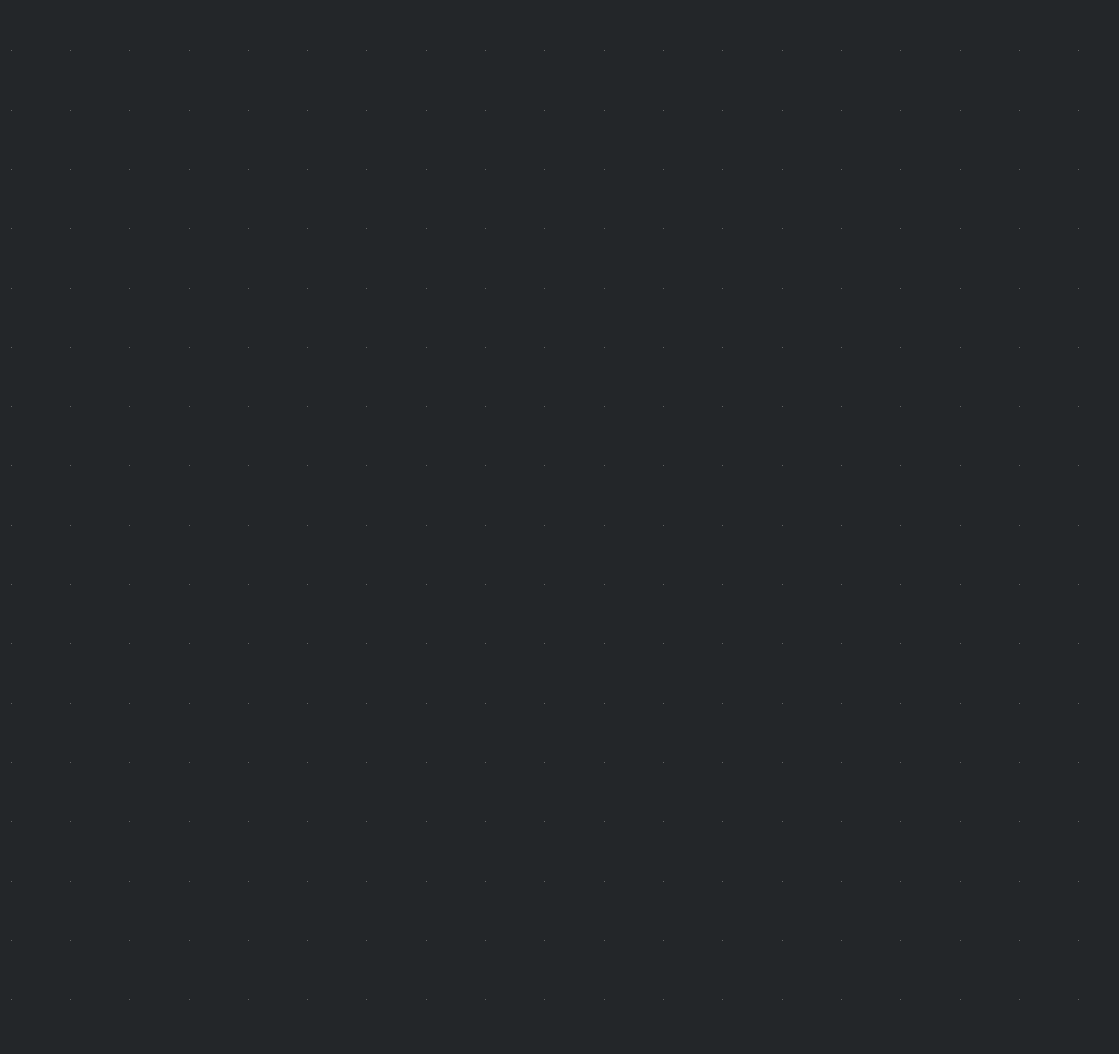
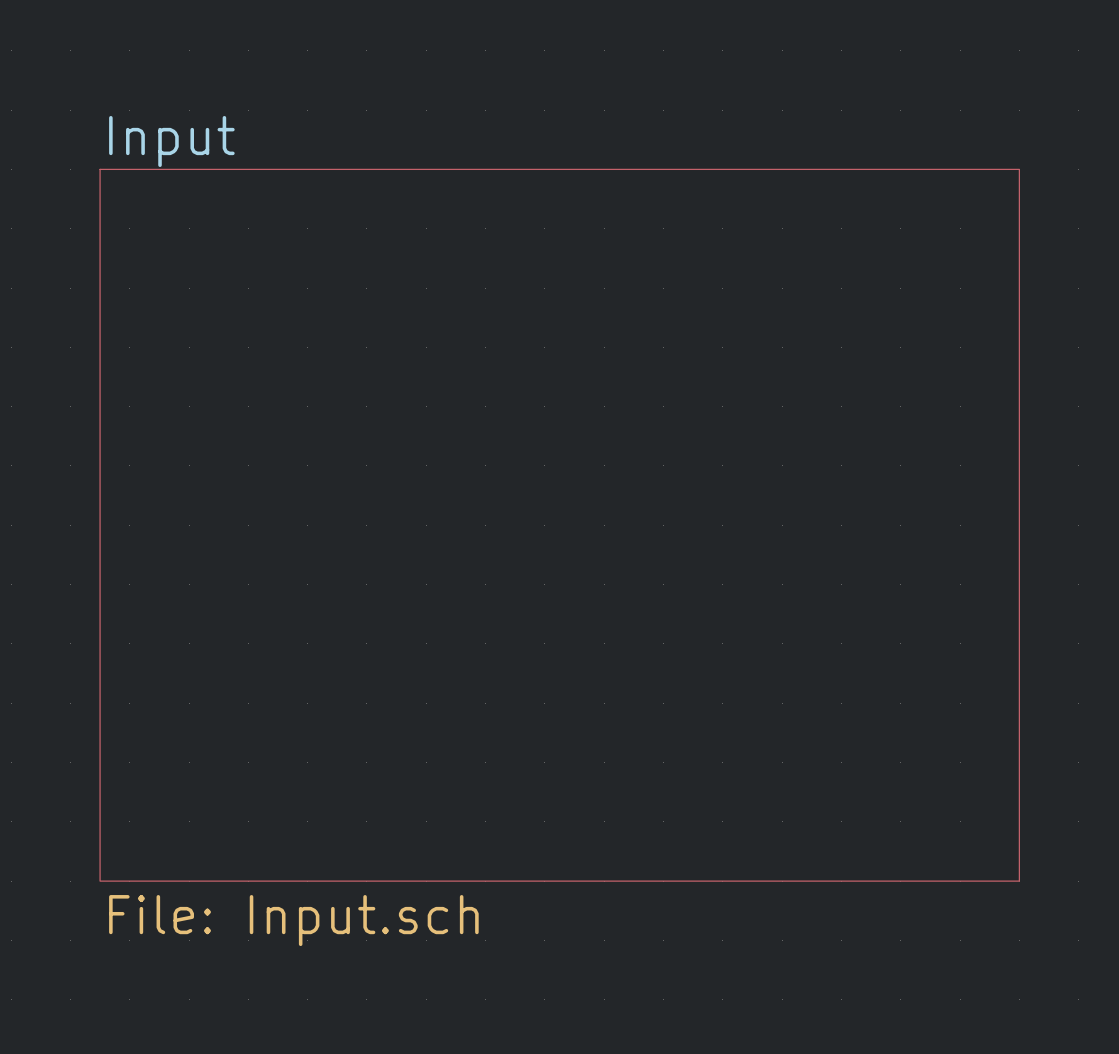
sheet Input: none -> File: Input.sch (559, 525)

